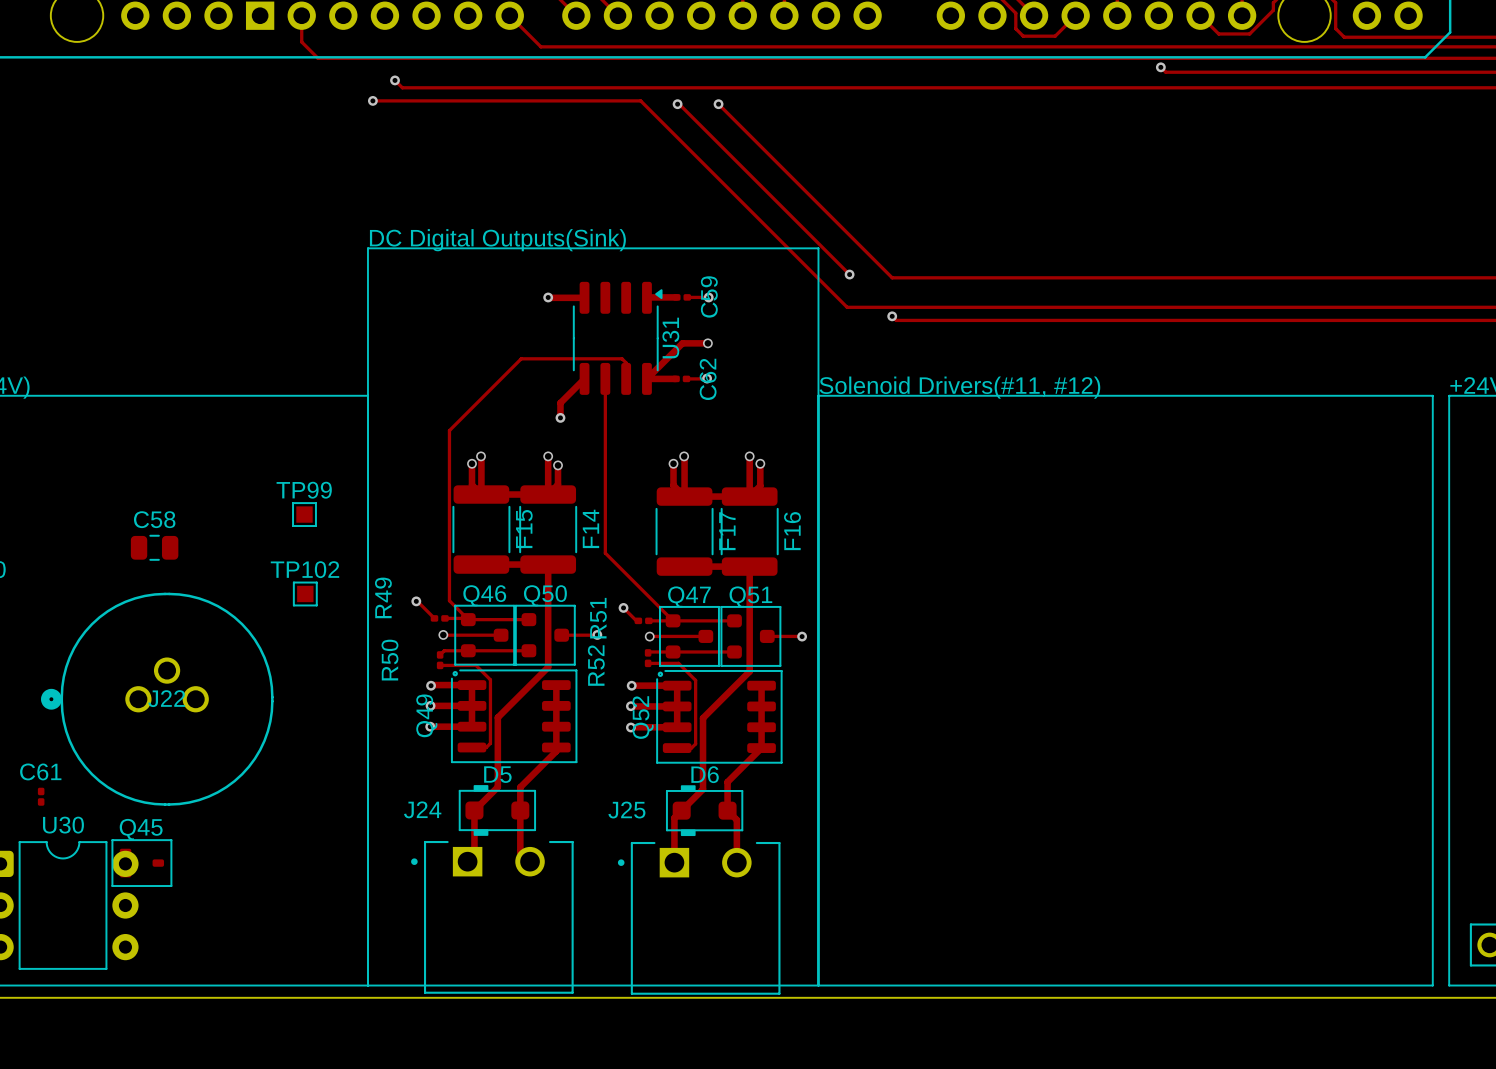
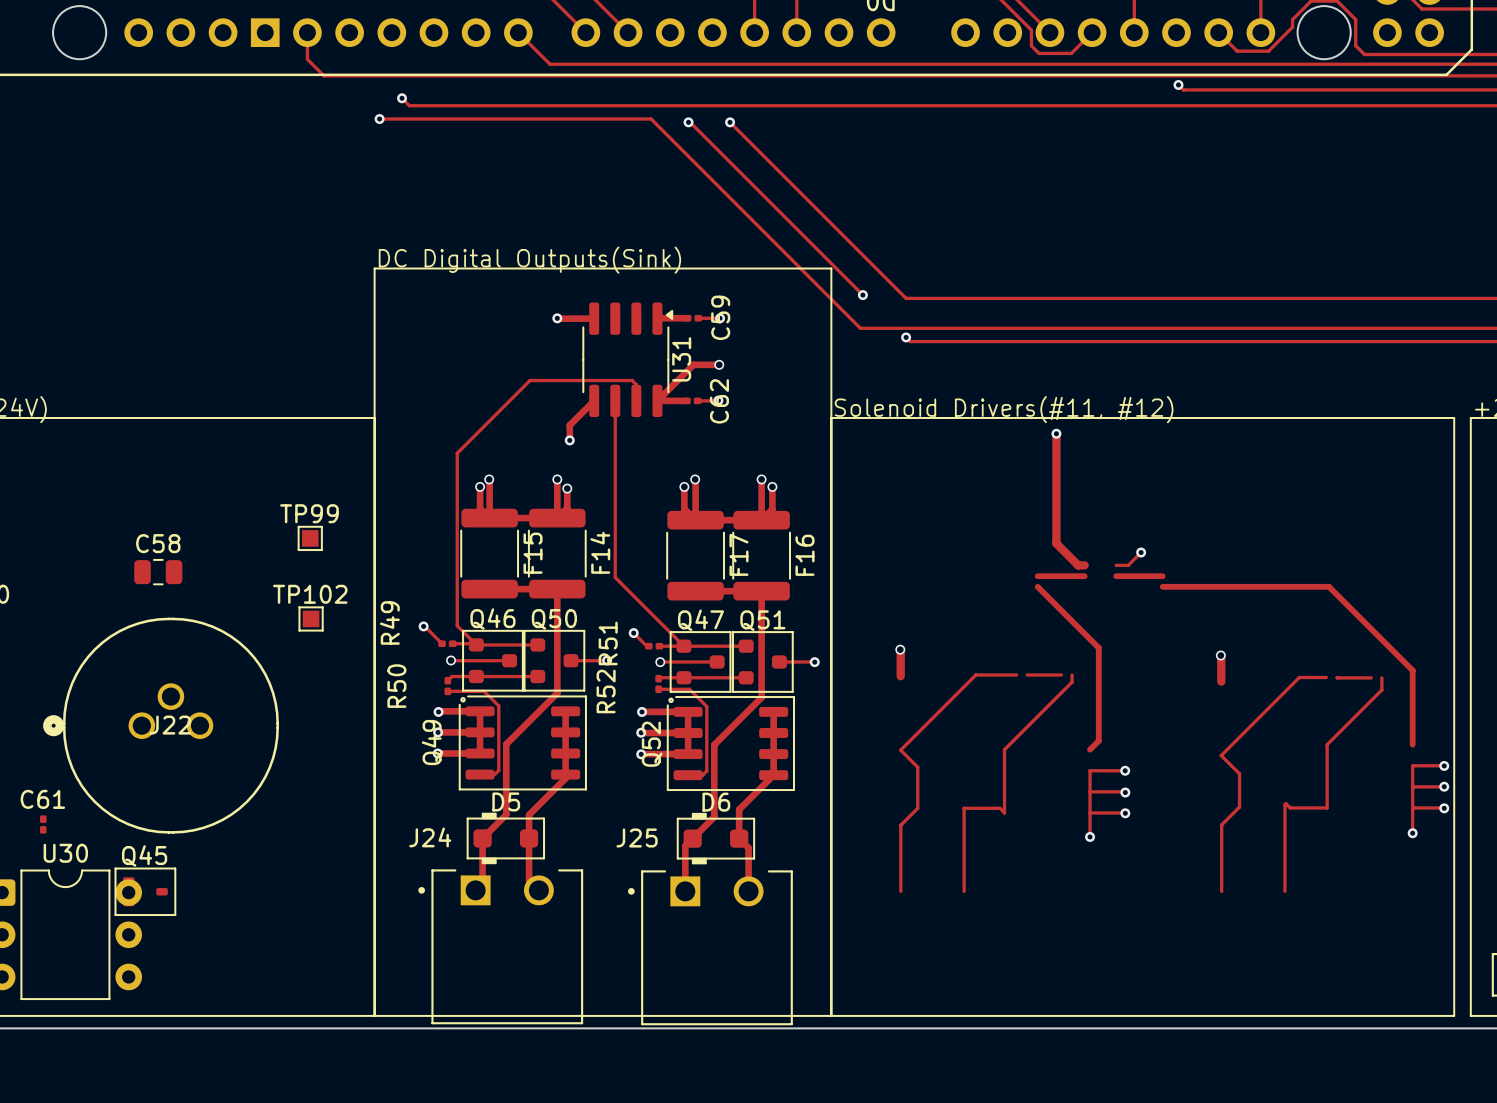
track: none -> (1056, 433) (1056, 543) (1078, 565) (1084, 565)
via: none -> (1056, 433)
track: none -> (1141, 552) (1128, 565) (1116, 565)
via: none -> (1141, 552)
track: none -> (1037, 576) (1084, 576)
track: none -> (1116, 576) (1162, 576)
track: none -> (1037, 586) (1098, 647) (1098, 740) (1090, 749)
track: none -> (1162, 586) (1329, 586) (1412, 670) (1412, 744)
track: none -> (900, 649) (900, 676)
via: none -> (900, 649)
track: none -> (1220, 655) (1221, 681)
via: none -> (1220, 655)
track: none -> (1016, 675) (975, 675) (900, 750) (917, 767) (917, 808) (900, 825) (900, 891)
track: none -> (1027, 675) (1061, 675)
track: none -> (1072, 675) (1072, 682) (1004, 749) (1004, 812) (999, 808) (964, 808)
track: none -> (1326, 677) (1299, 677) (1221, 755) (1239, 773) (1239, 807) (1221, 824) (1221, 891)
track: none -> (1336, 677) (1371, 677)
track: none -> (1381, 677) (1381, 689) (1327, 744) (1327, 807) (1290, 807) (1284, 804) (1284, 891)
track: none -> (1444, 765) (1412, 765) (1412, 833)
via: none -> (1444, 765)
track: none -> (1125, 770) (1090, 770) (1089, 837)
via: none -> (1125, 770)
track: none -> (1412, 786) (1444, 786)
via: none -> (1444, 786)
track: none -> (1090, 791) (1125, 792)
via: none -> (1125, 792)
track: none -> (964, 808) (964, 891)
track: none -> (1412, 807) (1444, 808)
via: none -> (1444, 808)
track: none -> (1090, 812) (1125, 813)
via: none -> (1125, 813)
via: none -> (1412, 833)
via: none -> (1090, 836)

